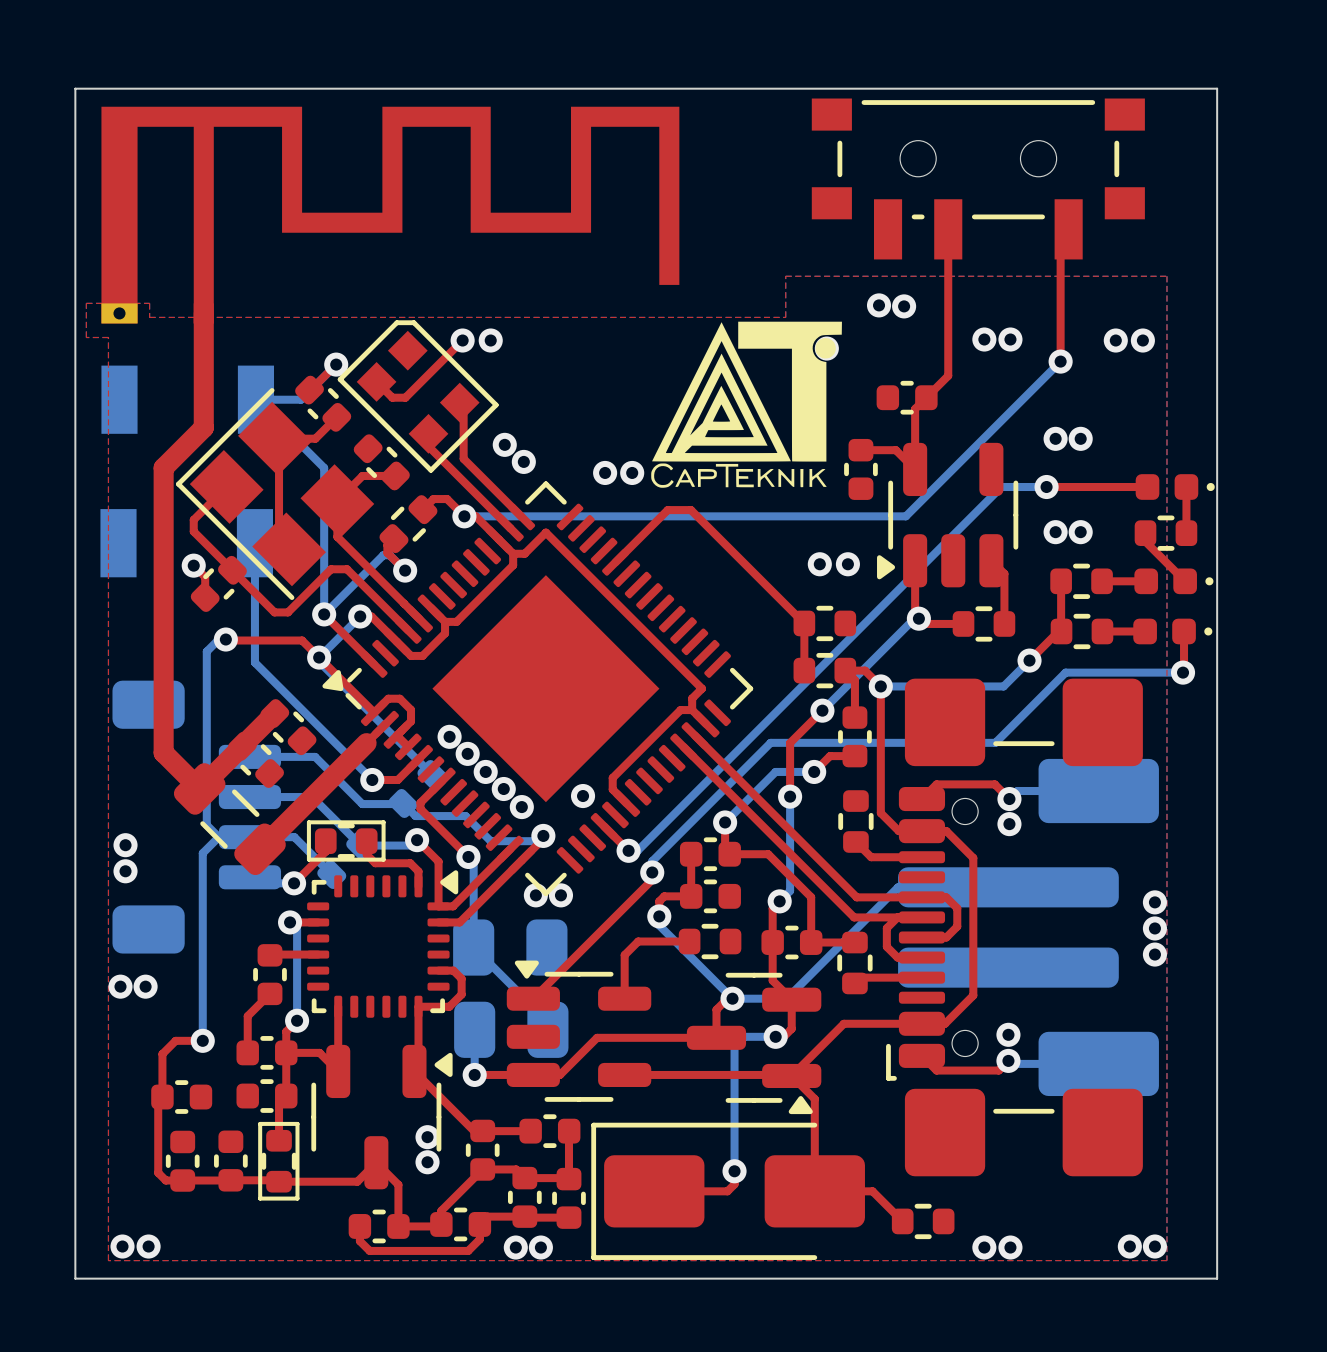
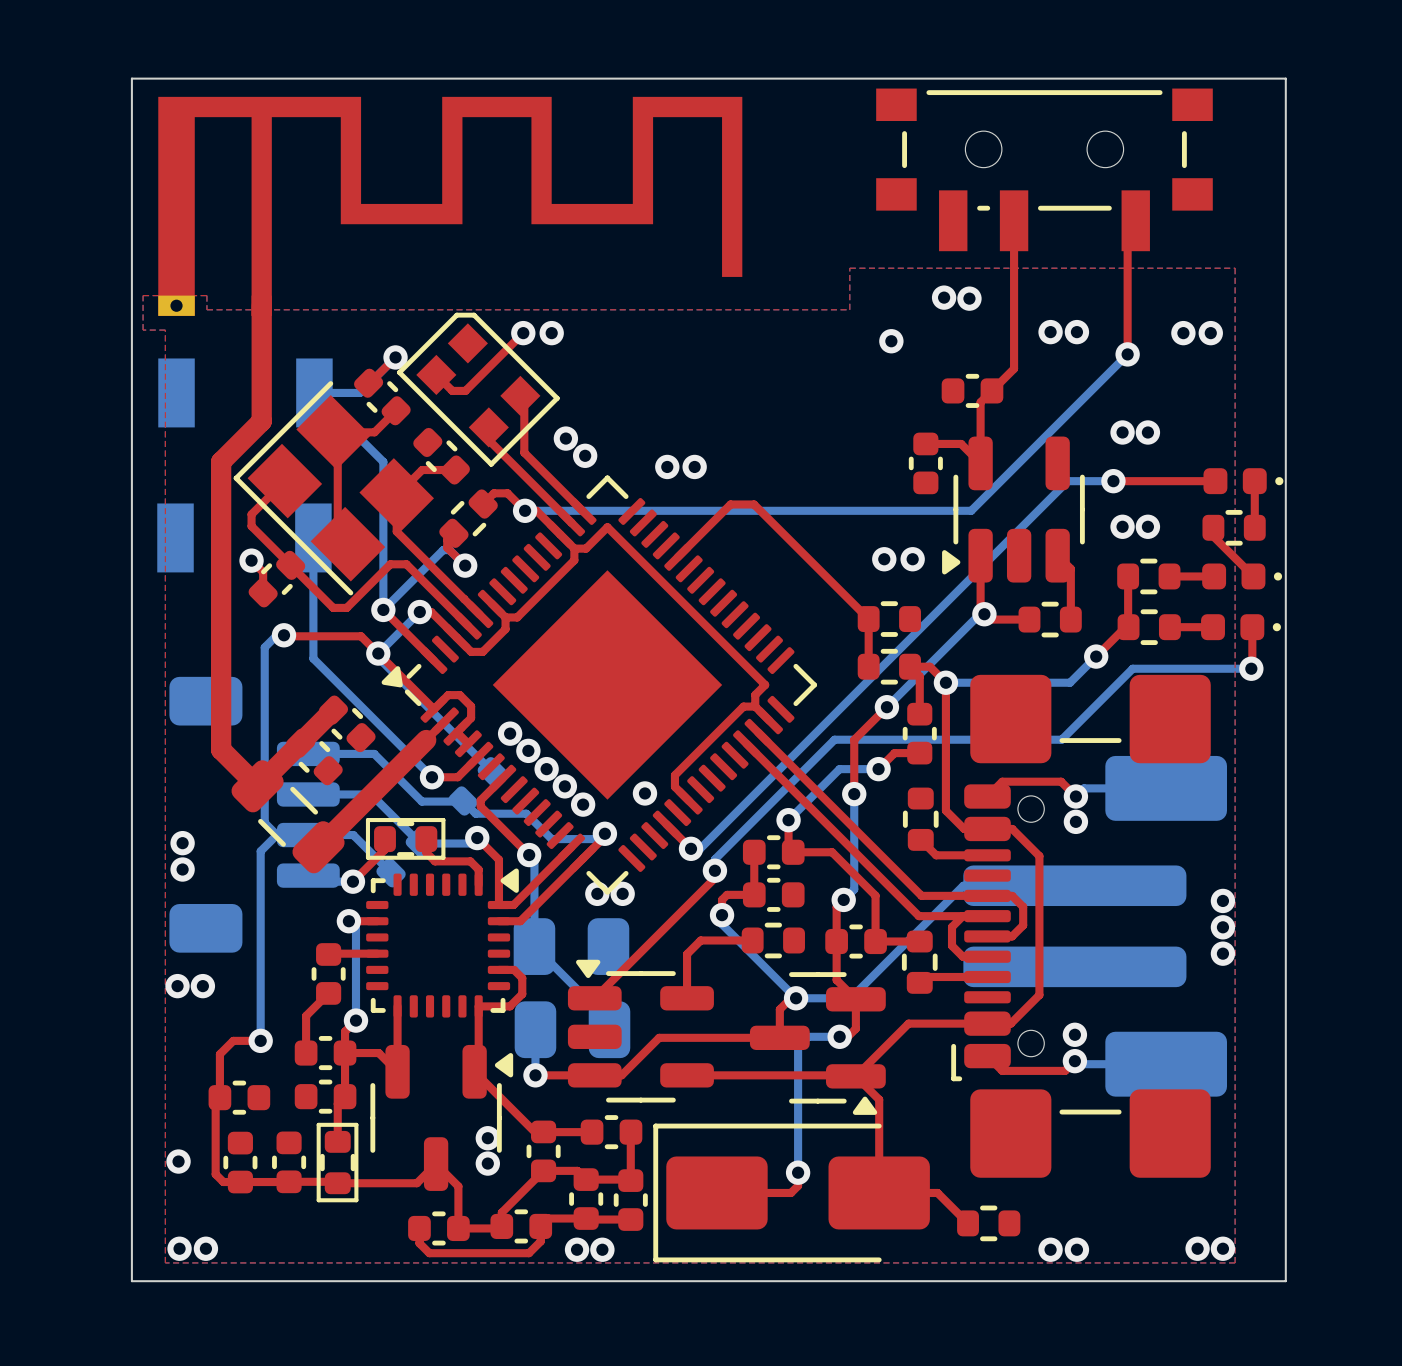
drawing: [651, 321, 842, 488] -> none
via: none -> (178, 1161)

